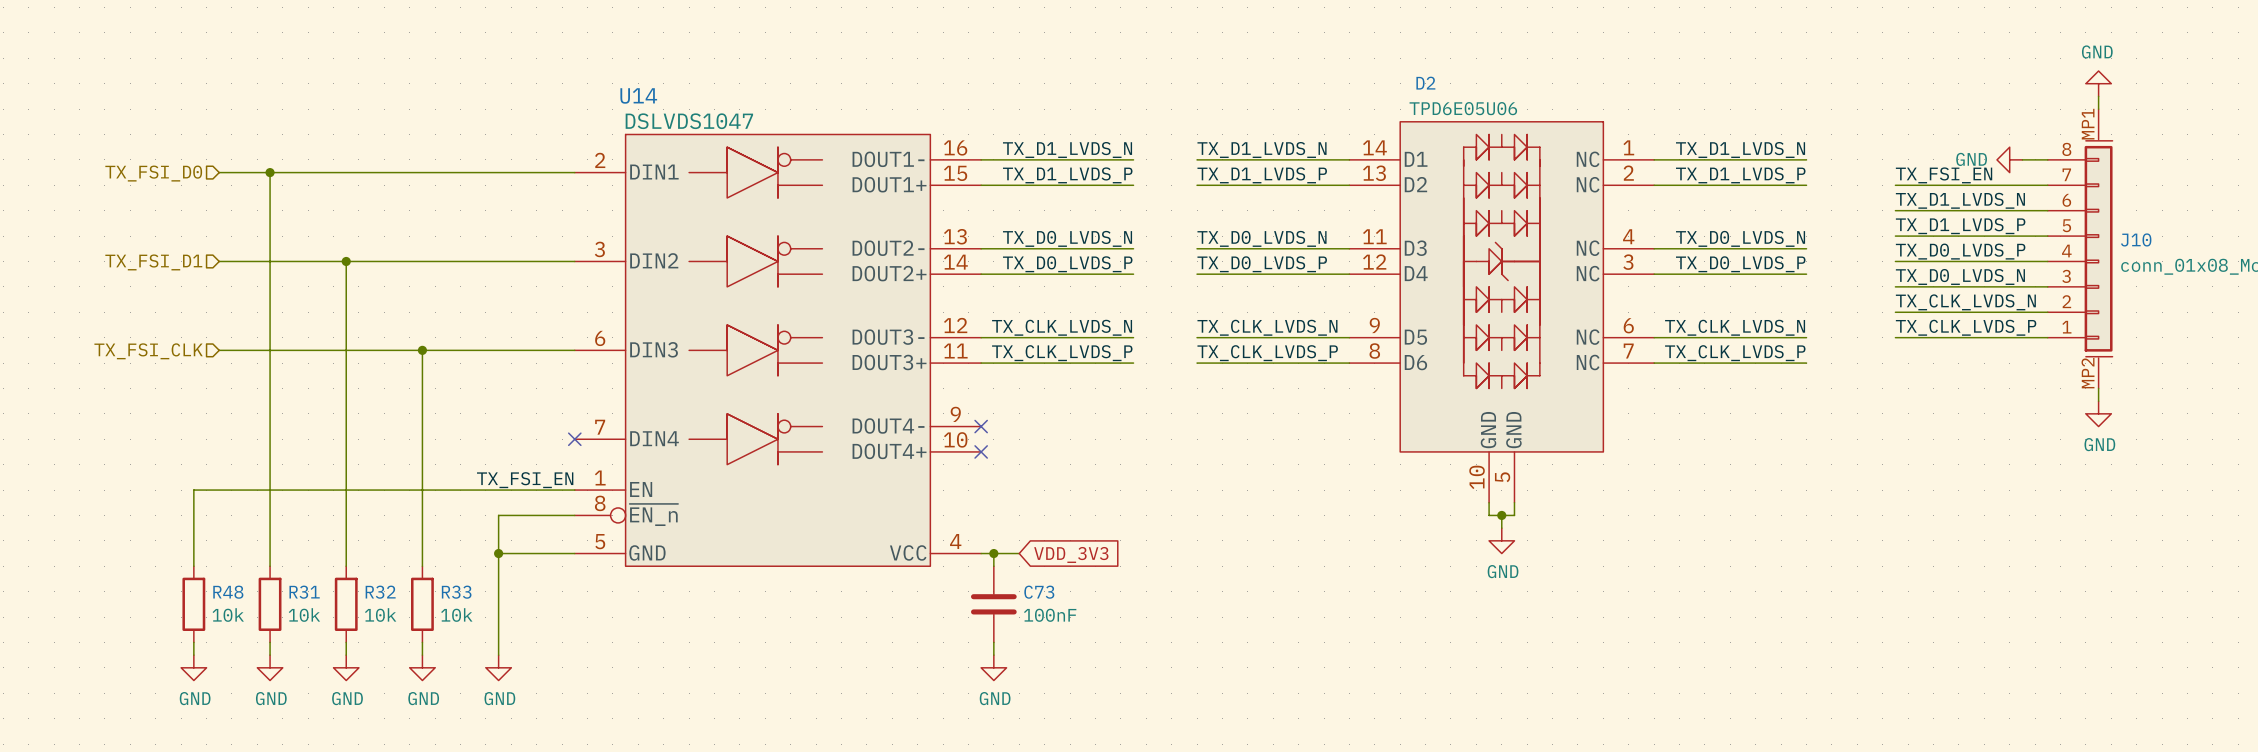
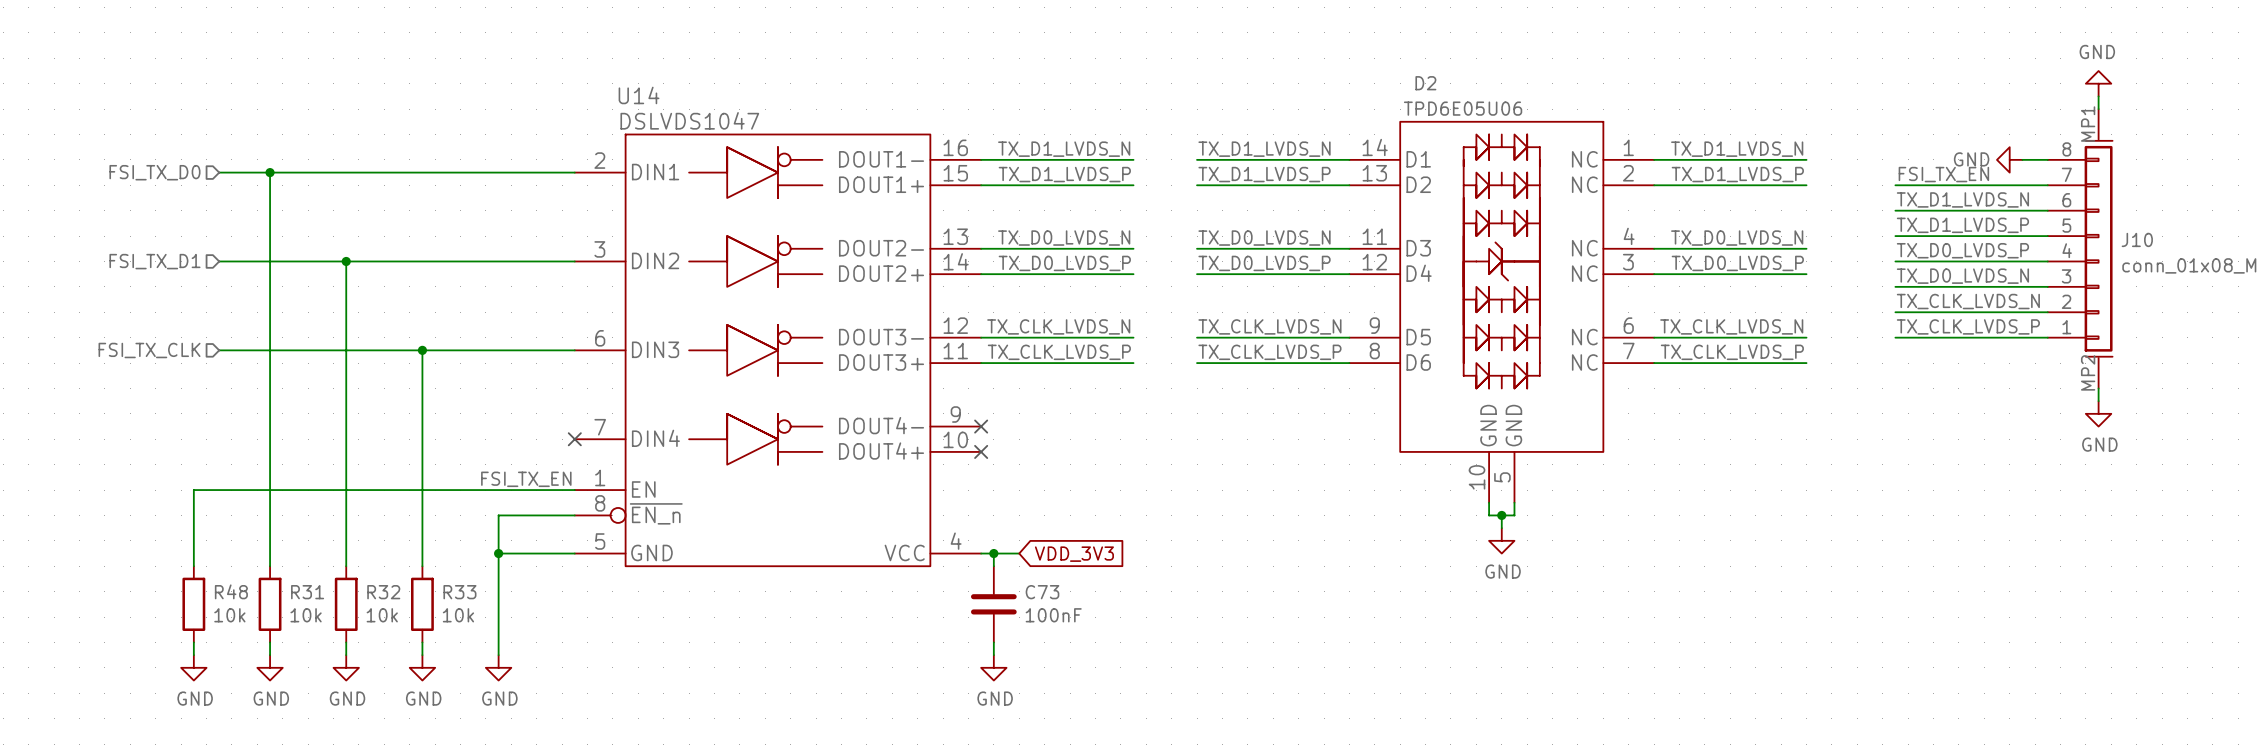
hierarchical label: TX_FSI_D0 (153, 173) -> FSI_TX_D0 (154, 172)
label: TX_FSI_EN (1944, 175) -> FSI_TX_EN (1943, 174)
hierarchical label: TX_FSI_D1 (153, 262) -> FSI_TX_D1 (154, 261)
hierarchical label: TX_FSI_CLK (148, 351) -> FSI_TX_CLK (149, 350)
label: TX_FSI_EN (525, 480) -> FSI_TX_EN (526, 479)

